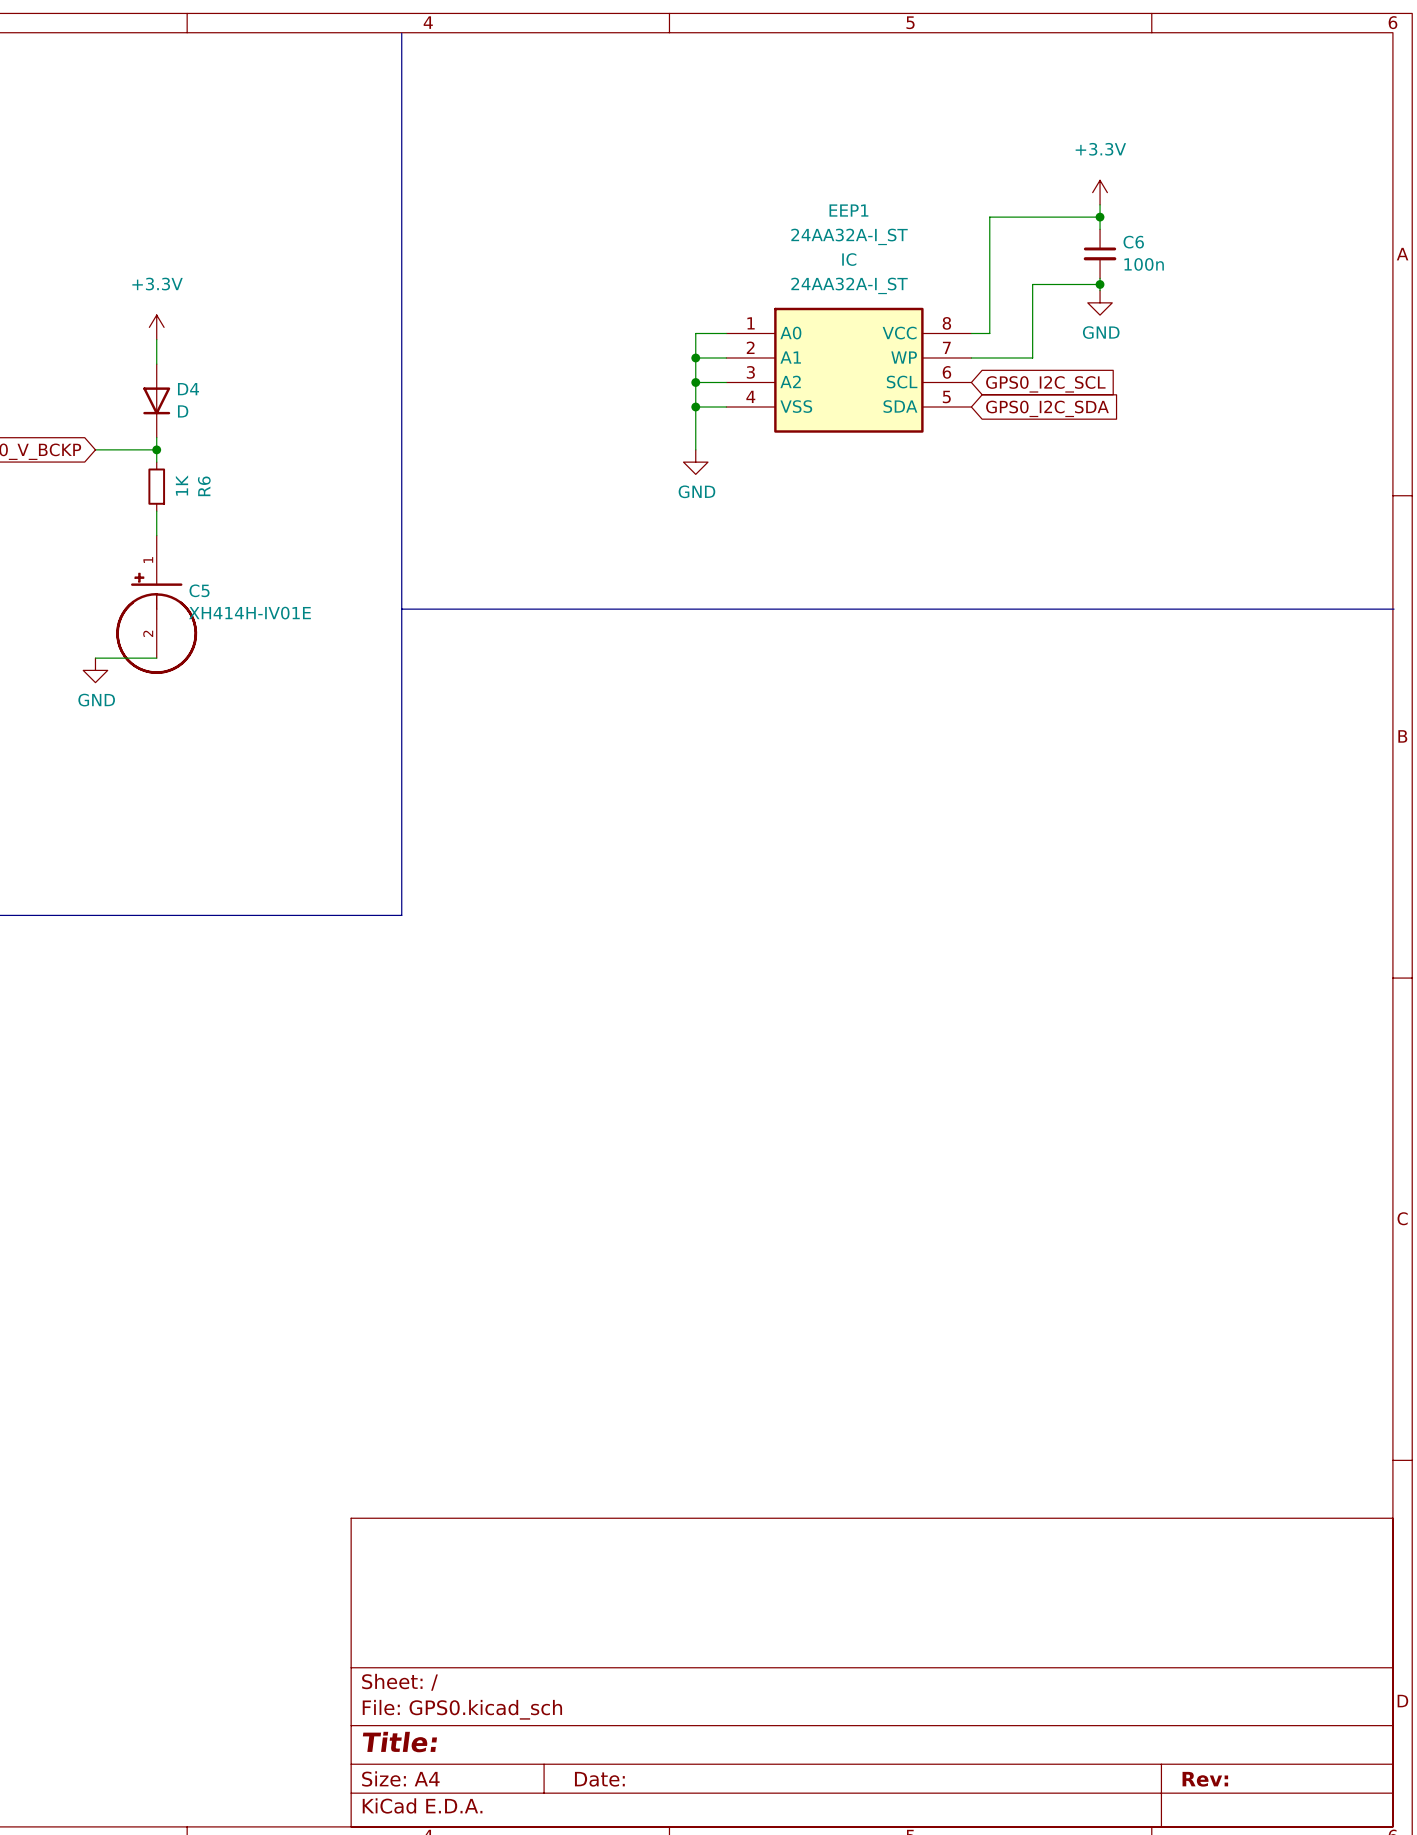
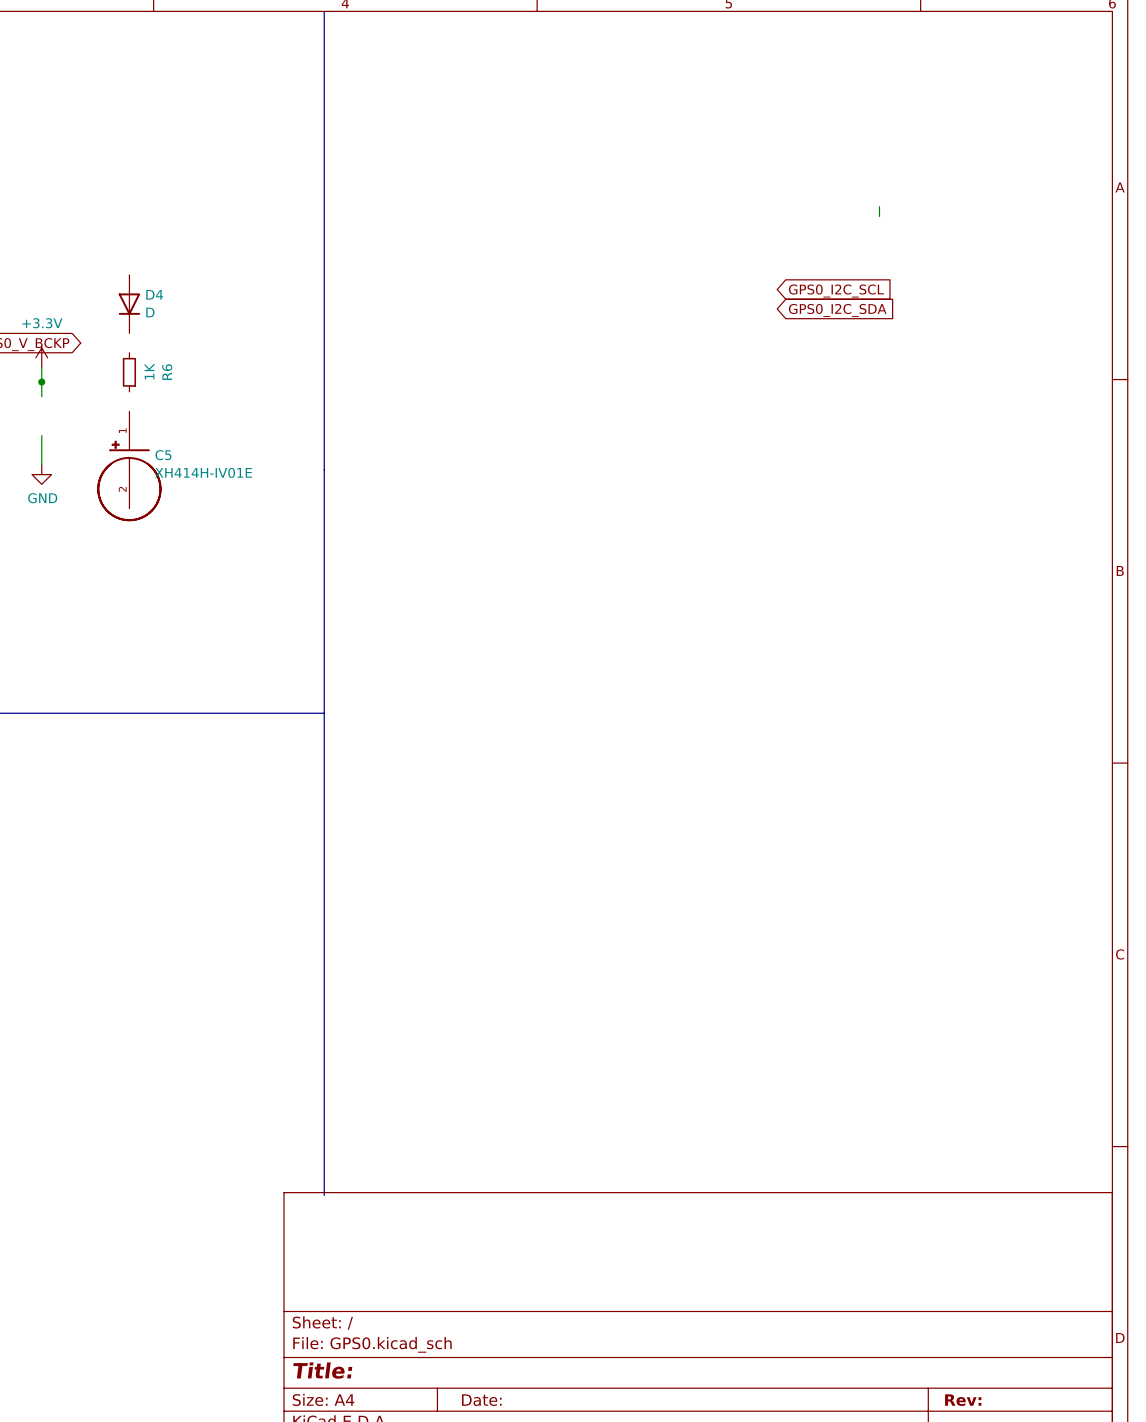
power symbol: +3.3V (1100, 192) -> none
wire: (1100, 204) (1100, 229) -> none
wire: (1100, 217) (989, 217) (989, 333) (971, 333) -> none
junction: (1100, 217) -> none
C6: 100n (1100, 253) -> none
wire: (1100, 284) (1032, 284) (1032, 357) (971, 357) -> none
junction: (1100, 284) -> none
power symbol: GND (1100, 302) -> none
power symbol position: +3.3V (156, 327) -> +3.3V (41, 357)
wire: (726, 333) (695, 333) (695, 449) -> none
wire: (156, 339) (156, 364) -> none
wire: (695, 357) (726, 357) -> none
junction: (695, 357) -> none
EEP1: 24AA32A-I_ST (848, 370) -> none
wire: (695, 382) (726, 382) -> none
junction: (695, 382) -> none
wire: (695, 407) (726, 407) -> none
junction: (695, 407) -> none
wire: (156, 437) (156, 462) -> none
wire: (95, 449) (156, 449) -> none
junction: (156, 449) -> none
power symbol: GND (695, 462) -> none
wire: none -> (41, 367) (41, 396)
junction: none -> (41, 382)
wire: (156, 511) (156, 535) -> none
wire: none -> (41, 435) (41, 464)
line: (401, 609) (1394, 609) -> none
wire: (95, 658) (156, 658) -> none
power symbol position: GND (95, 670) -> GND (41, 474)
line: none -> (324, 713) (324, 1195)

